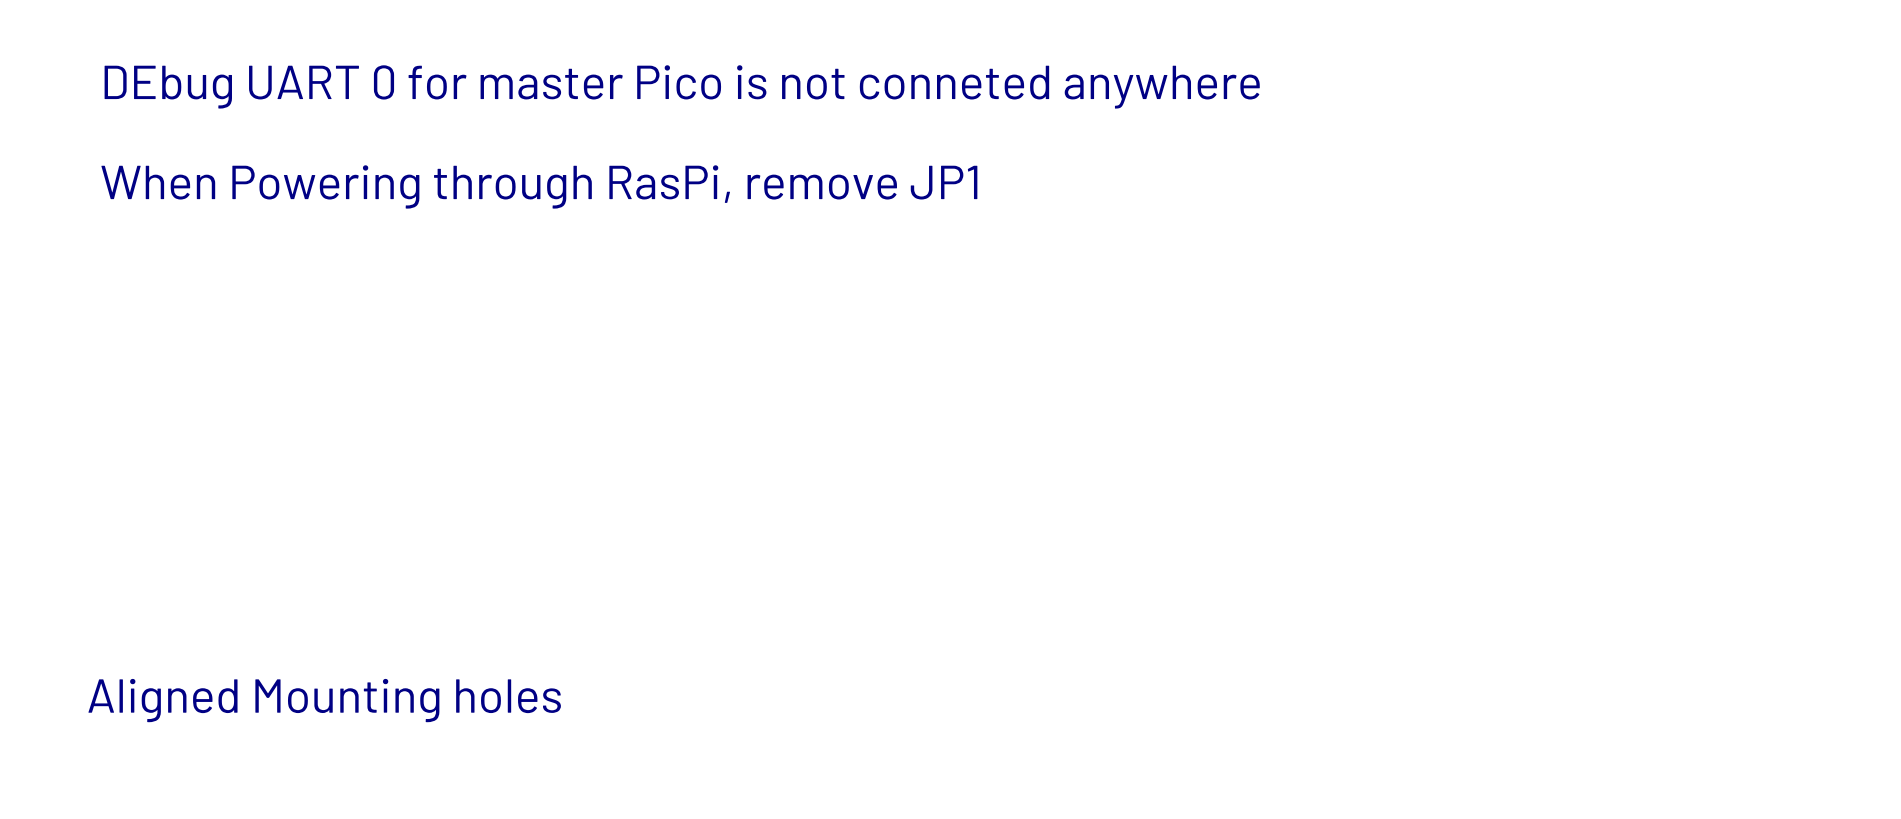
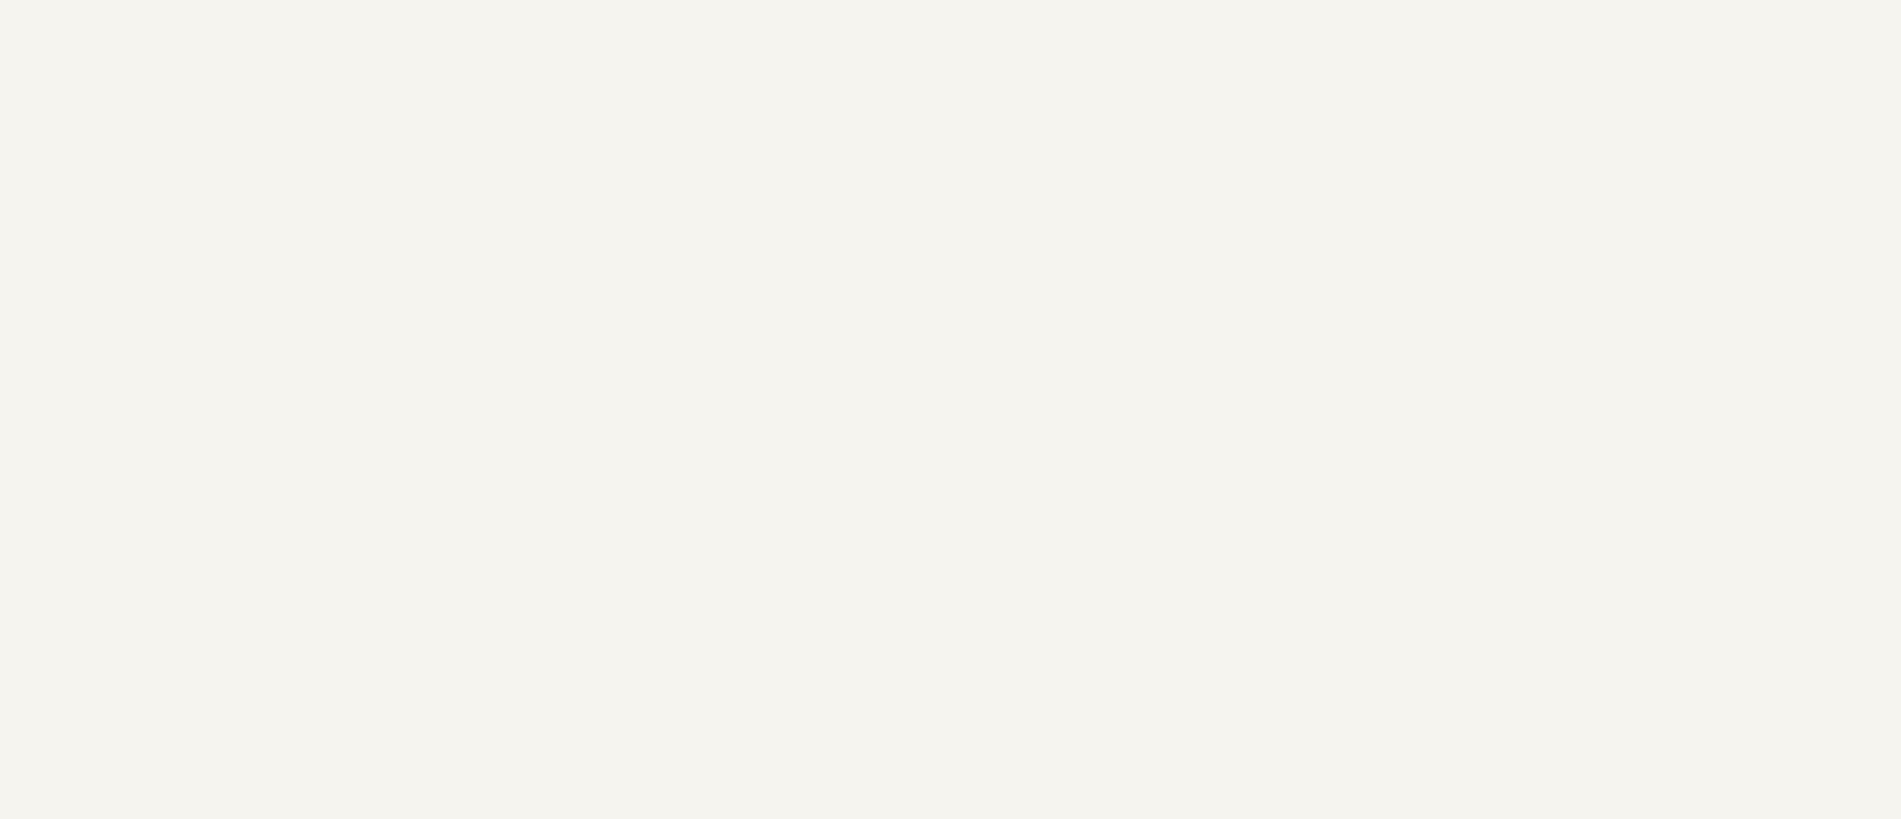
text: DEbug UART 0 for master Pico is not conneted anywhere (682, 86) -> none
text: When Powering through RasPi, remove JP1 (539, 186) -> none
text: Aligned Mounting holes (324, 700) -> none

